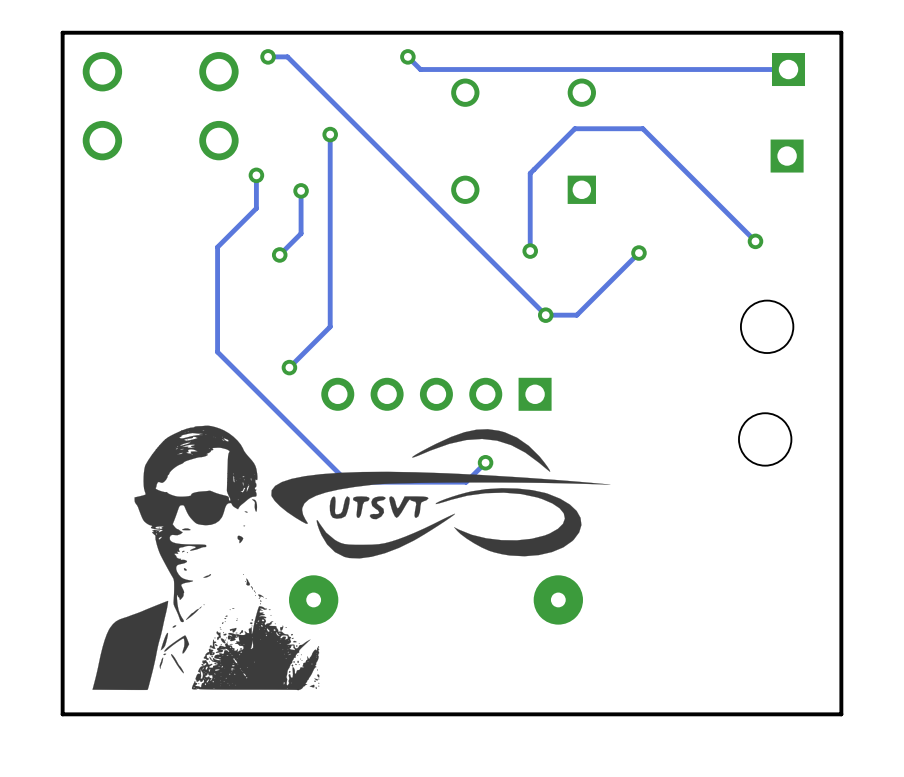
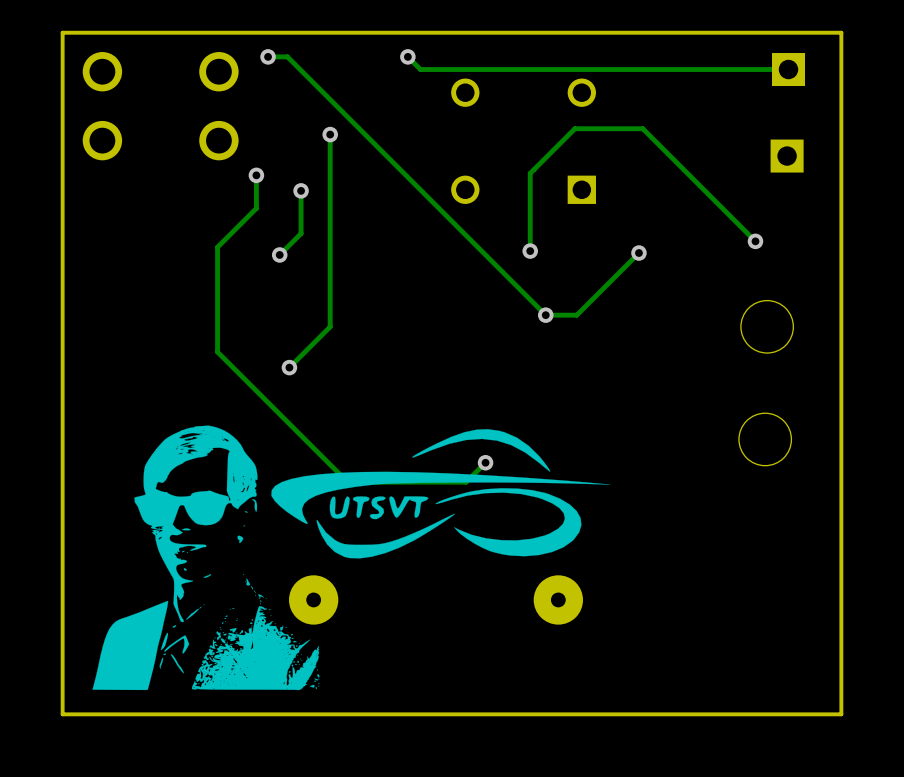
part: (436, 394) -> none

